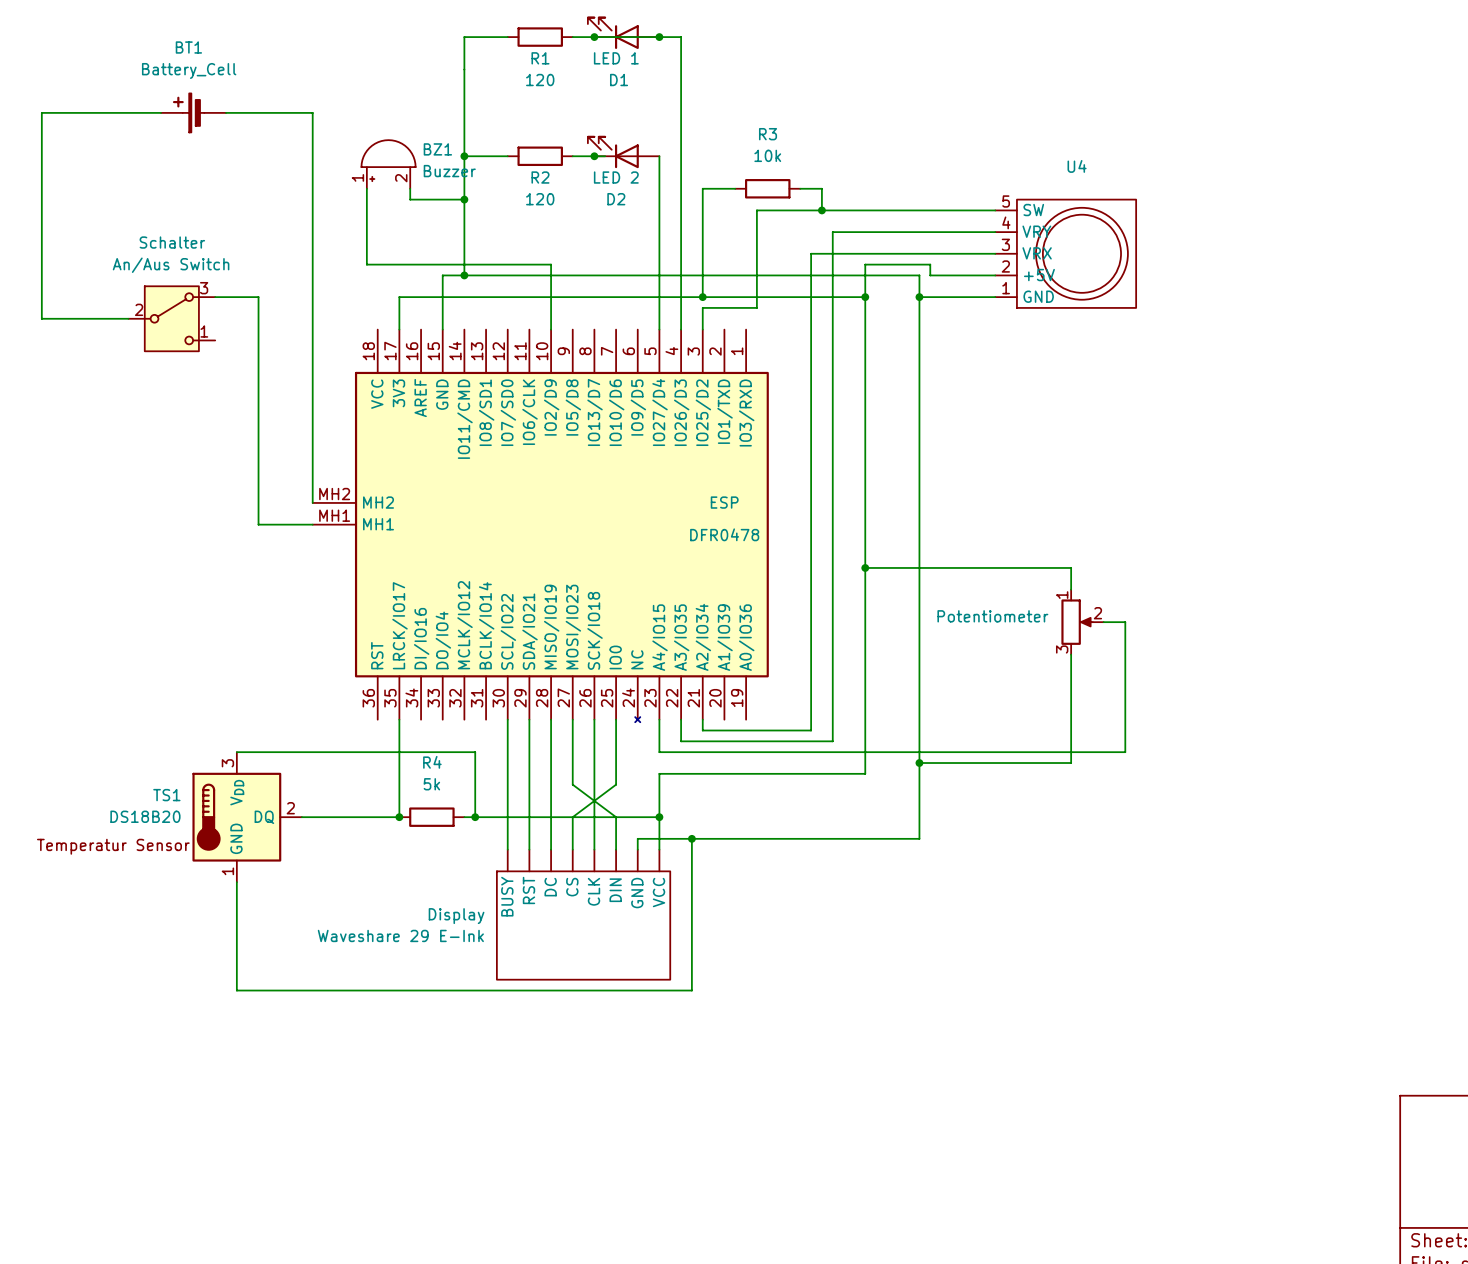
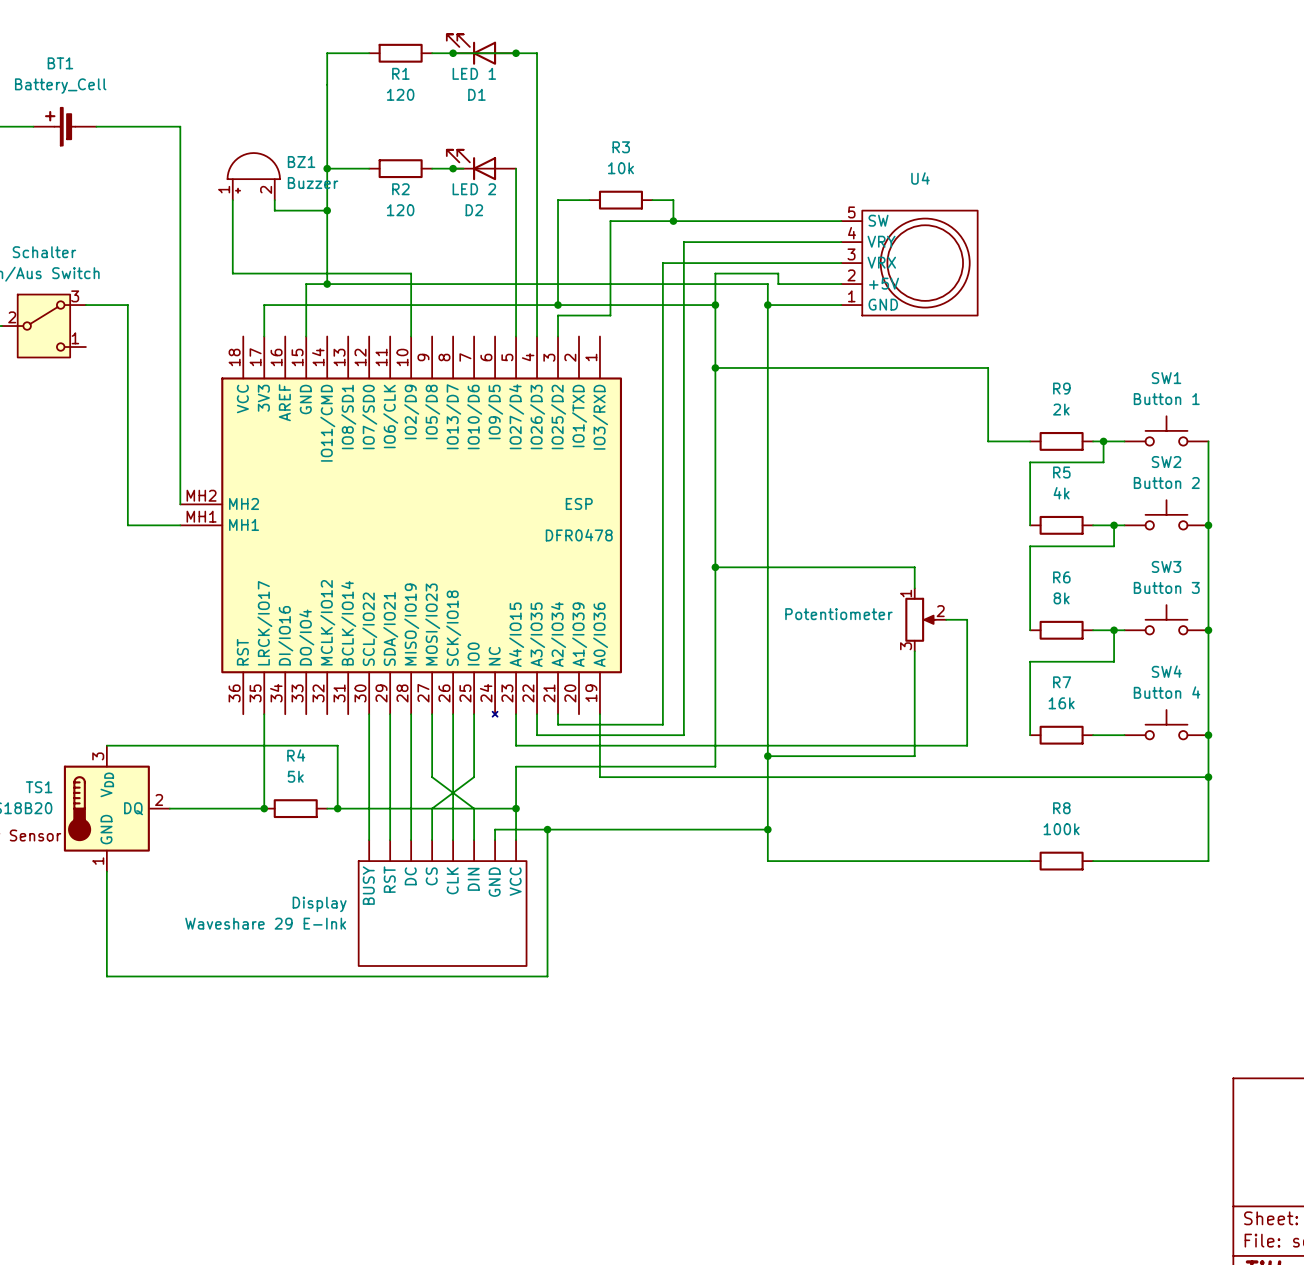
wire: none -> (715, 367) (988, 367) (988, 441) (1030, 441)
junction: none -> (715, 367)
SW1: none -> Button 1 (1166, 430)
R9: none -> 2k (1061, 441)
wire: none -> (1093, 441) (1124, 441)
wire: none -> (1103, 441) (1103, 462) (1030, 462) (1030, 525)
junction: none -> (1103, 441)
wire: none -> (1208, 441) (1208, 861) (1093, 861)
SW2: none -> Button 2 (1166, 514)
R5: none -> 4k (1061, 525)
wire: none -> (1093, 525) (1124, 525)
wire: none -> (1114, 525) (1114, 546) (1030, 546) (1030, 630)
junction: none -> (1114, 525)
junction: none -> (1208, 525)
SW3: none -> Button 3 (1166, 619)
R6: none -> 8k (1061, 630)
wire: none -> (1093, 630) (1124, 630)
wire: none -> (1114, 630) (1114, 661) (1030, 661) (1030, 735)
junction: none -> (1114, 630)
junction: none -> (1208, 630)
wire: none -> (599, 714) (599, 777) (1208, 777)
SW4: none -> Button 4 (1166, 724)
R7: none -> 16k (1061, 735)
wire: none -> (1093, 735) (1124, 735)
junction: none -> (1208, 735)
junction: none -> (1208, 777)
wire: none -> (767, 829) (767, 861) (1030, 861)
junction: none -> (767, 829)
R8: none -> 100k (1061, 861)

